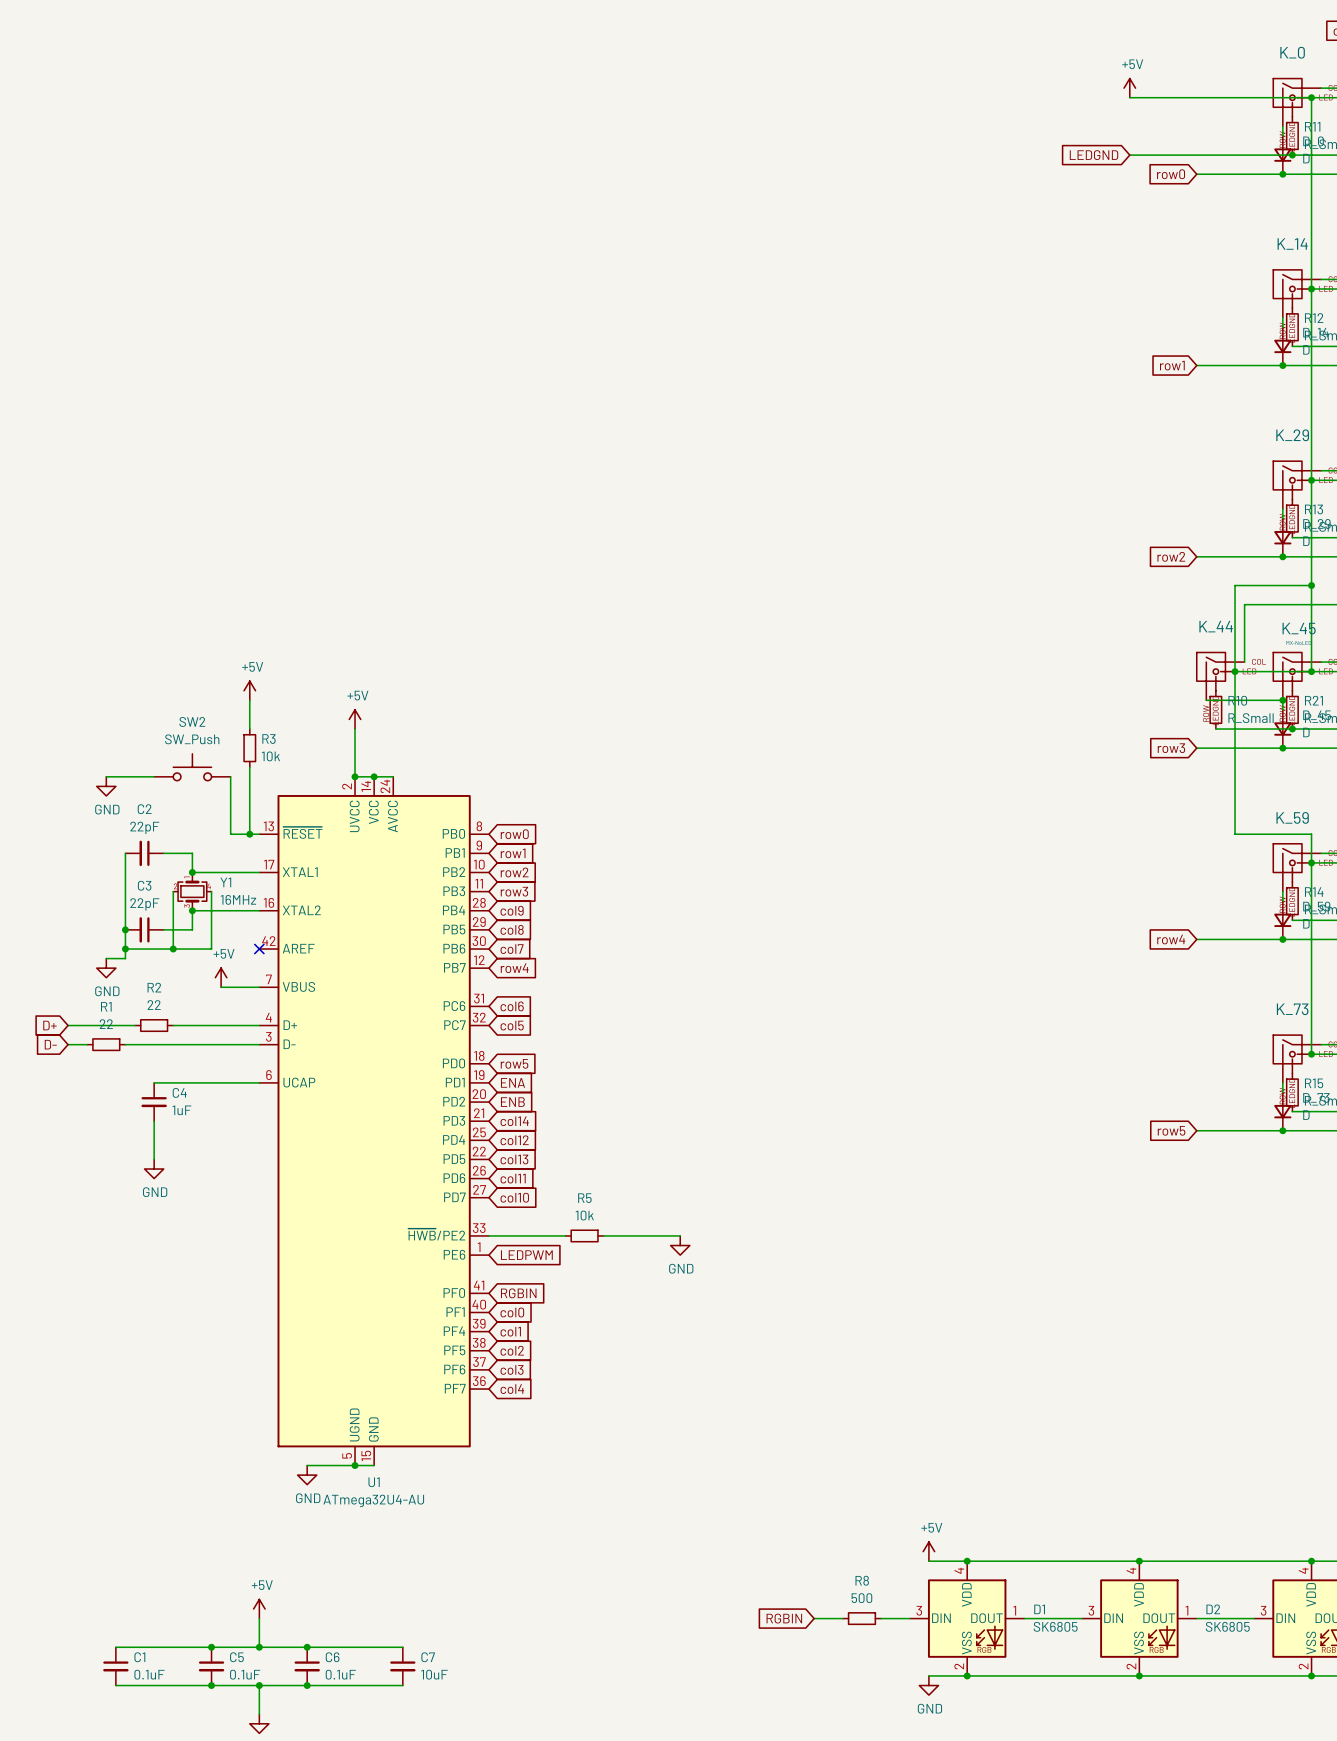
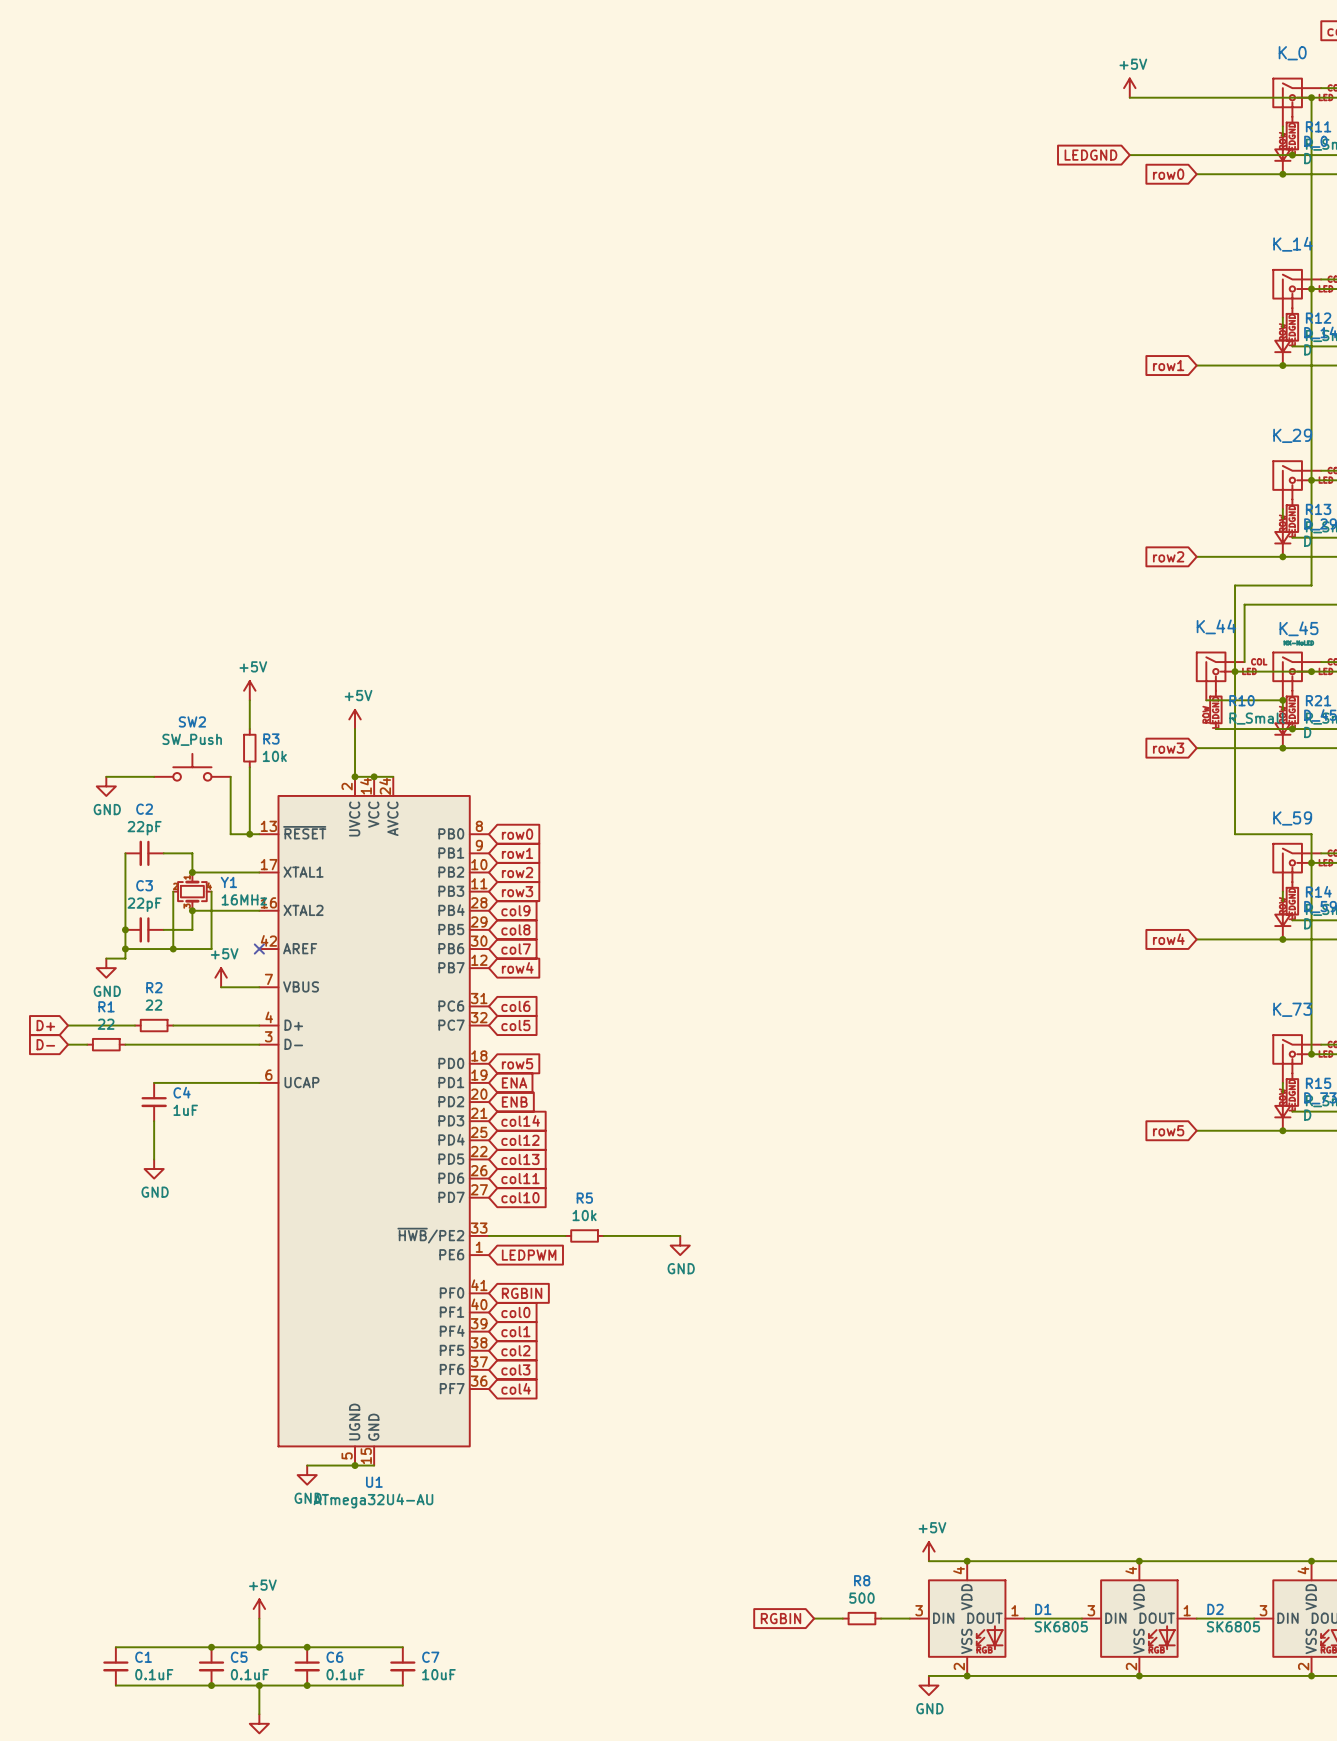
wire: (1311, 585) (1311, 671) -> none
junction: (1311, 585) -> none

